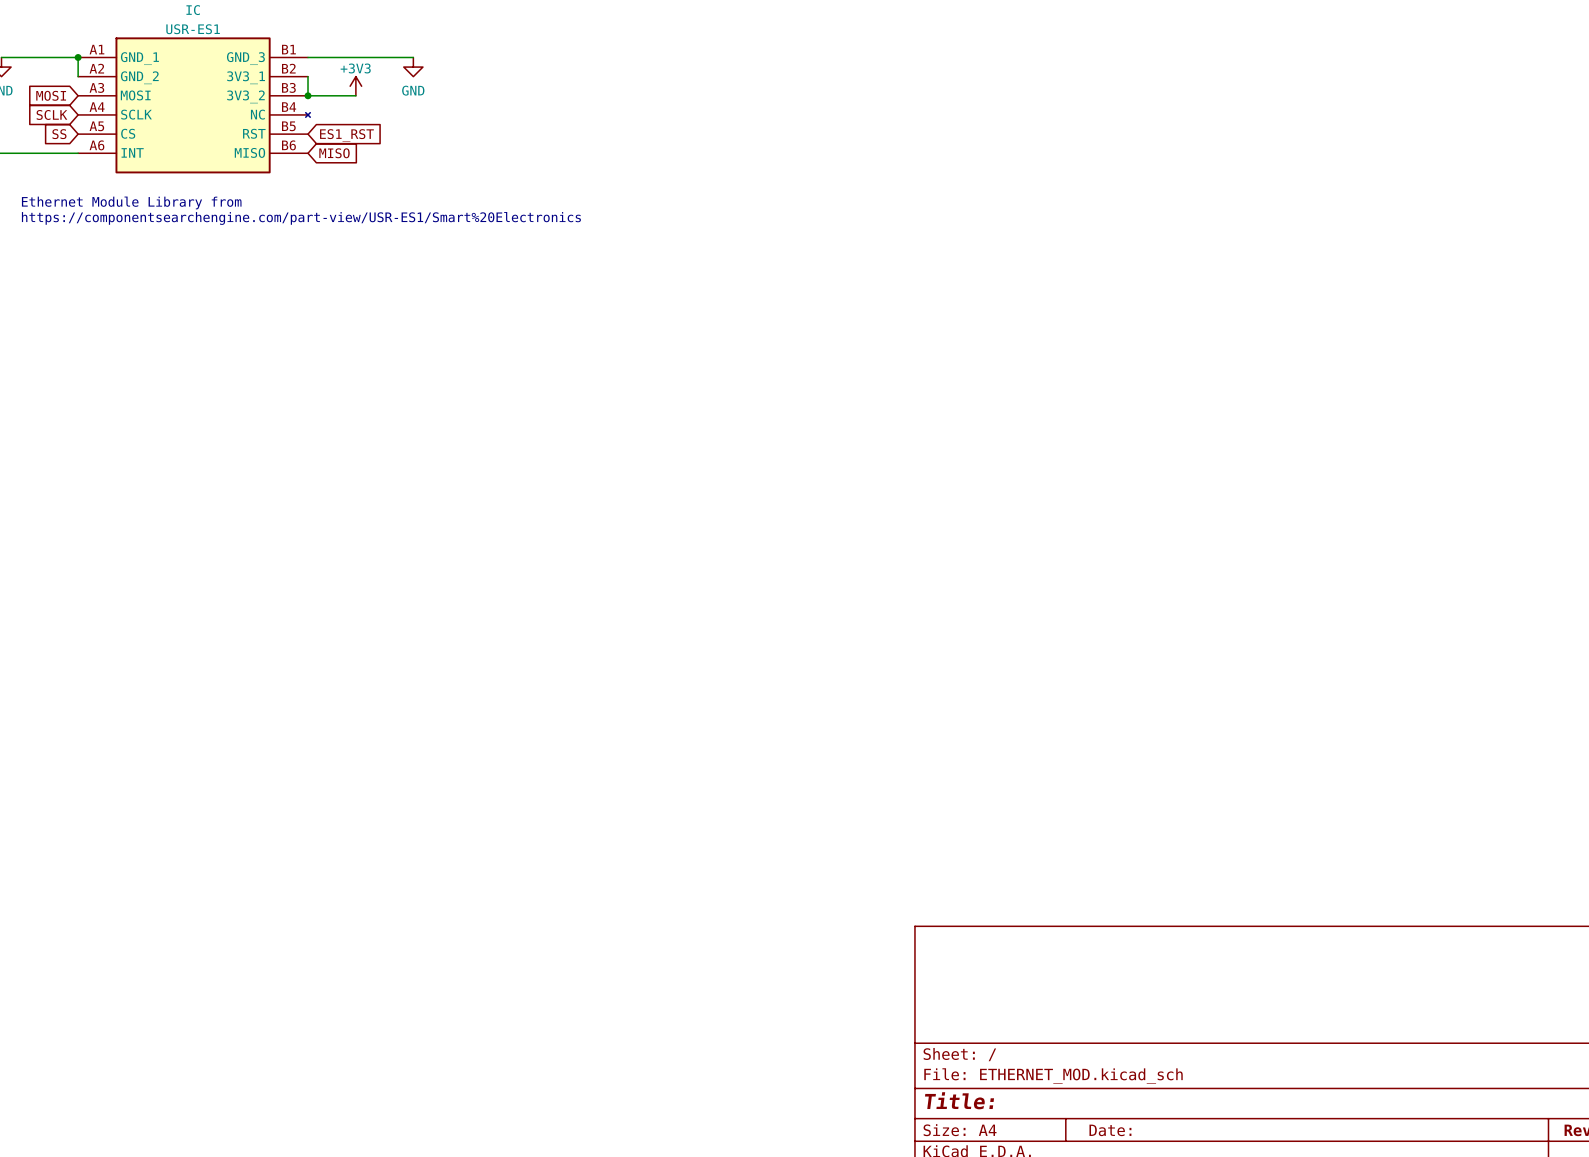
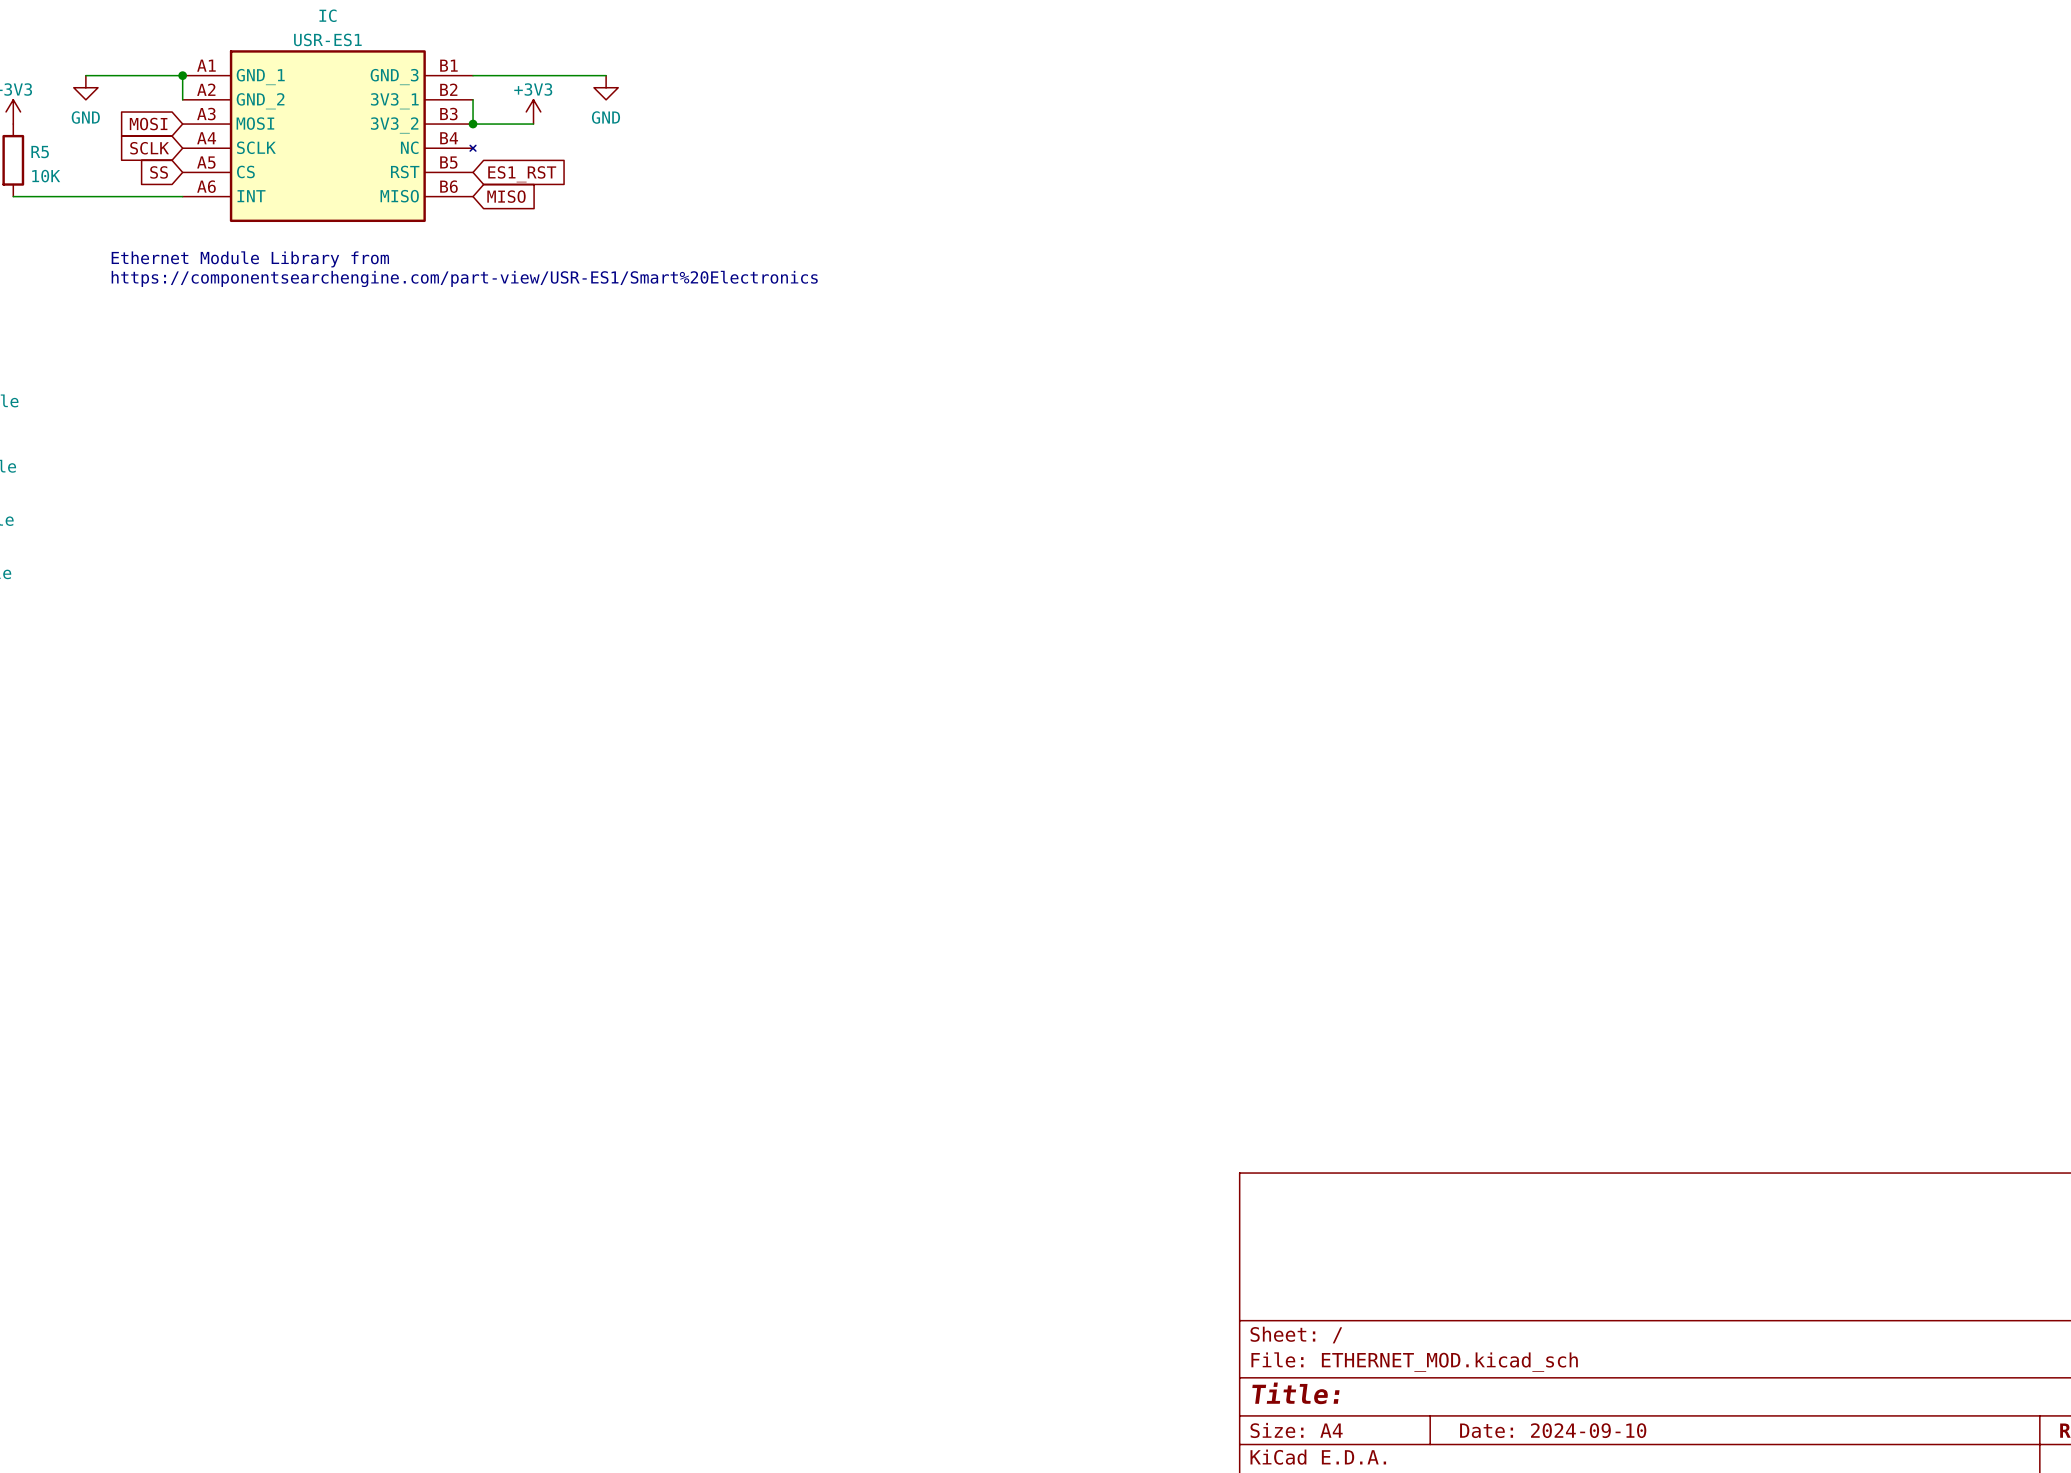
title block: Date: (1110, 1130) -> Date: 2024-09-10 (1553, 1430)

